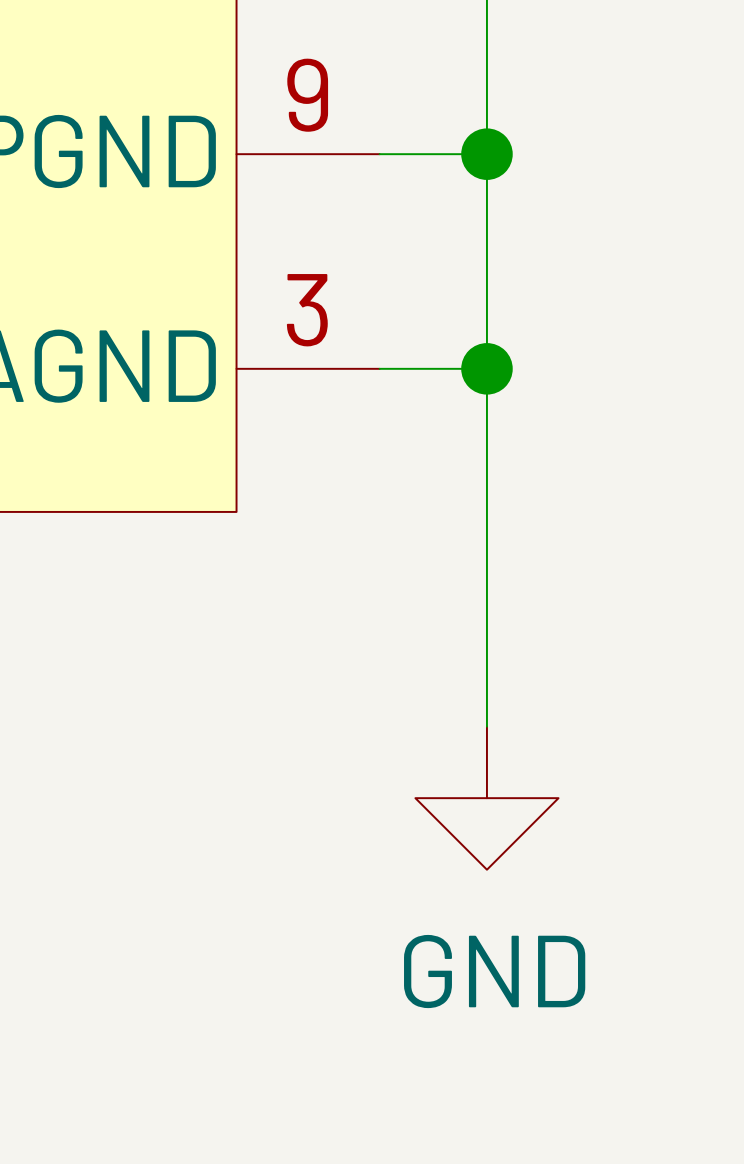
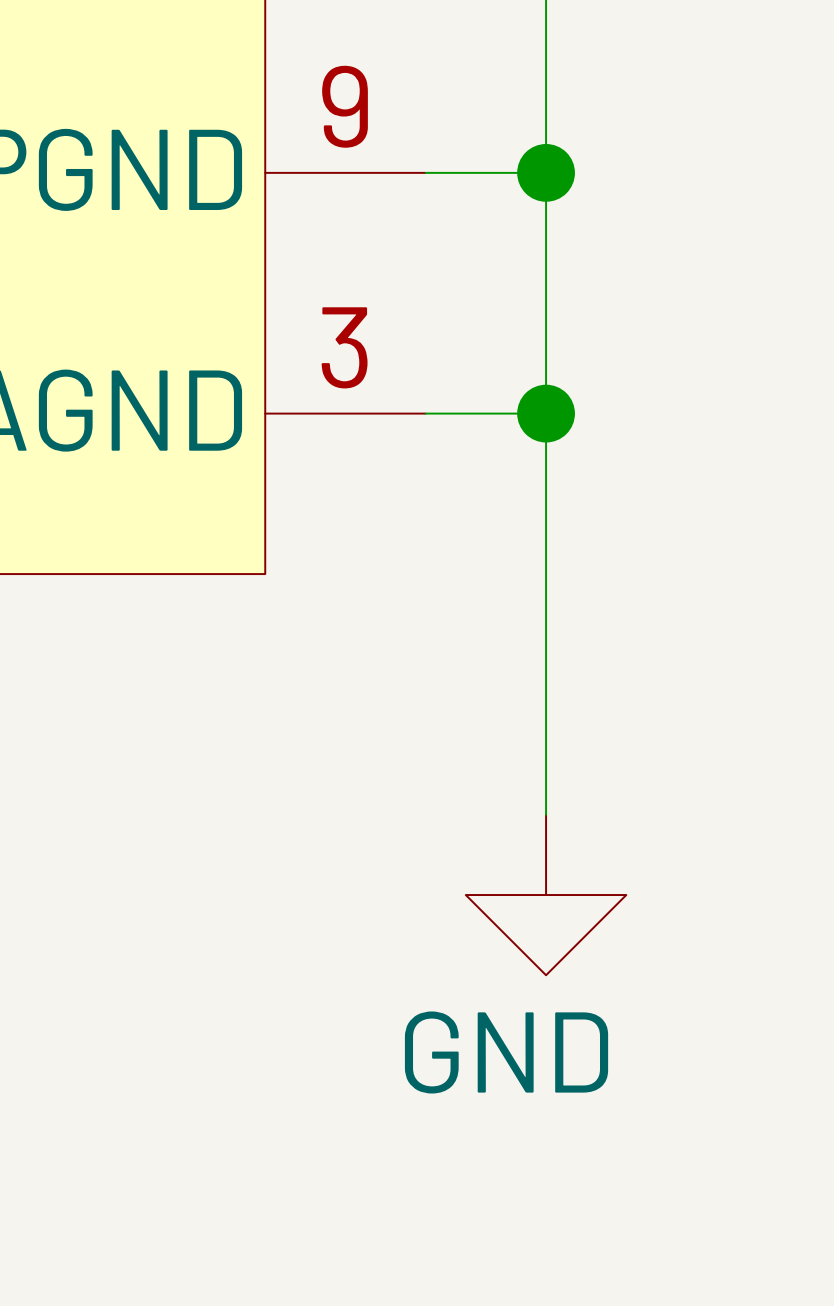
power symbol text position: GND (494, 971) -> GND (506, 1052)

